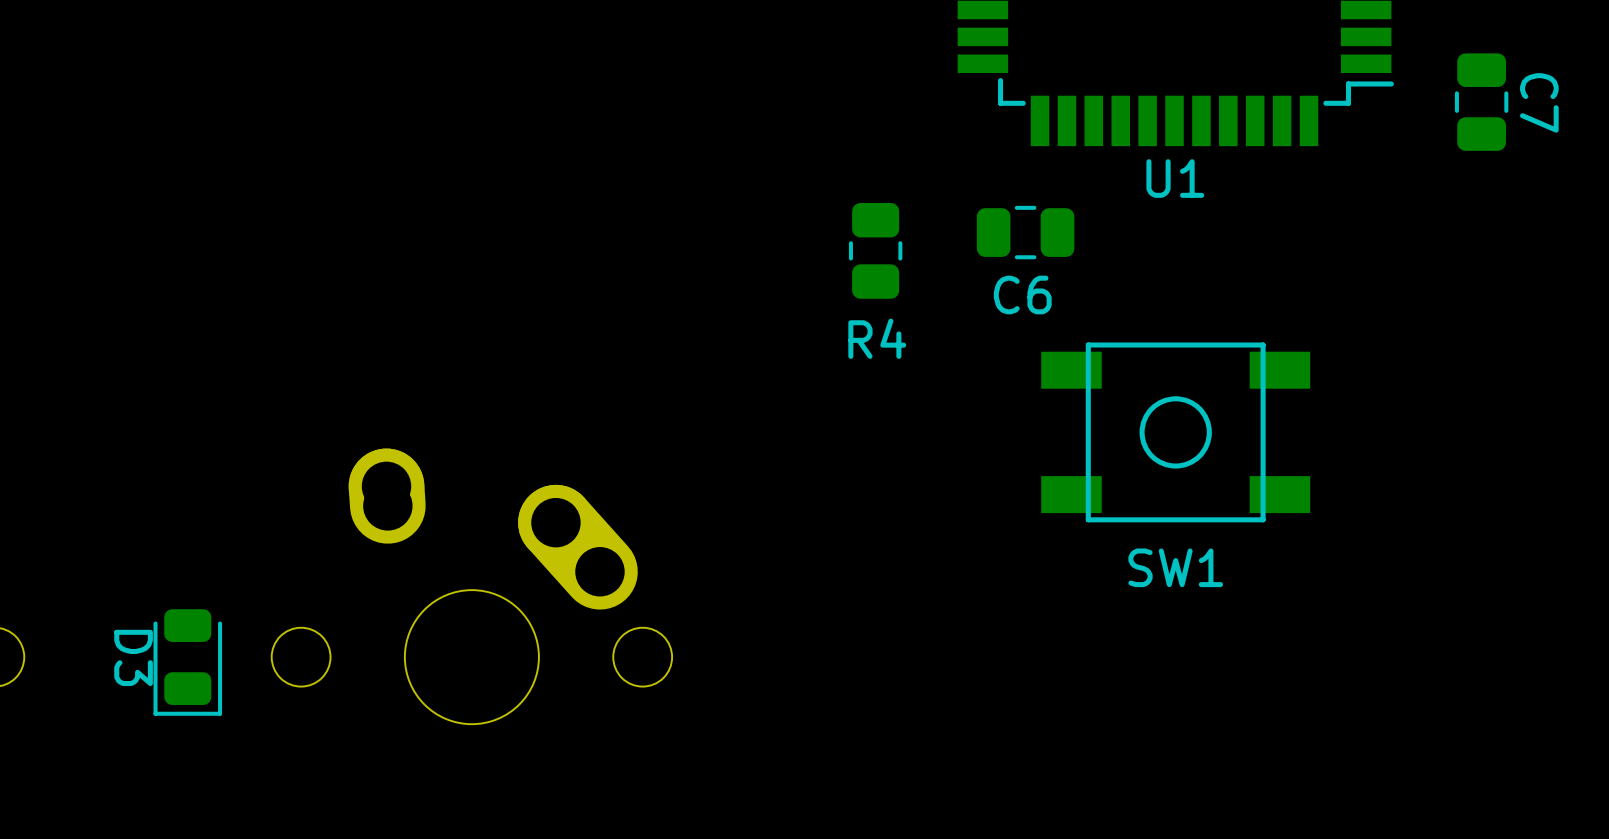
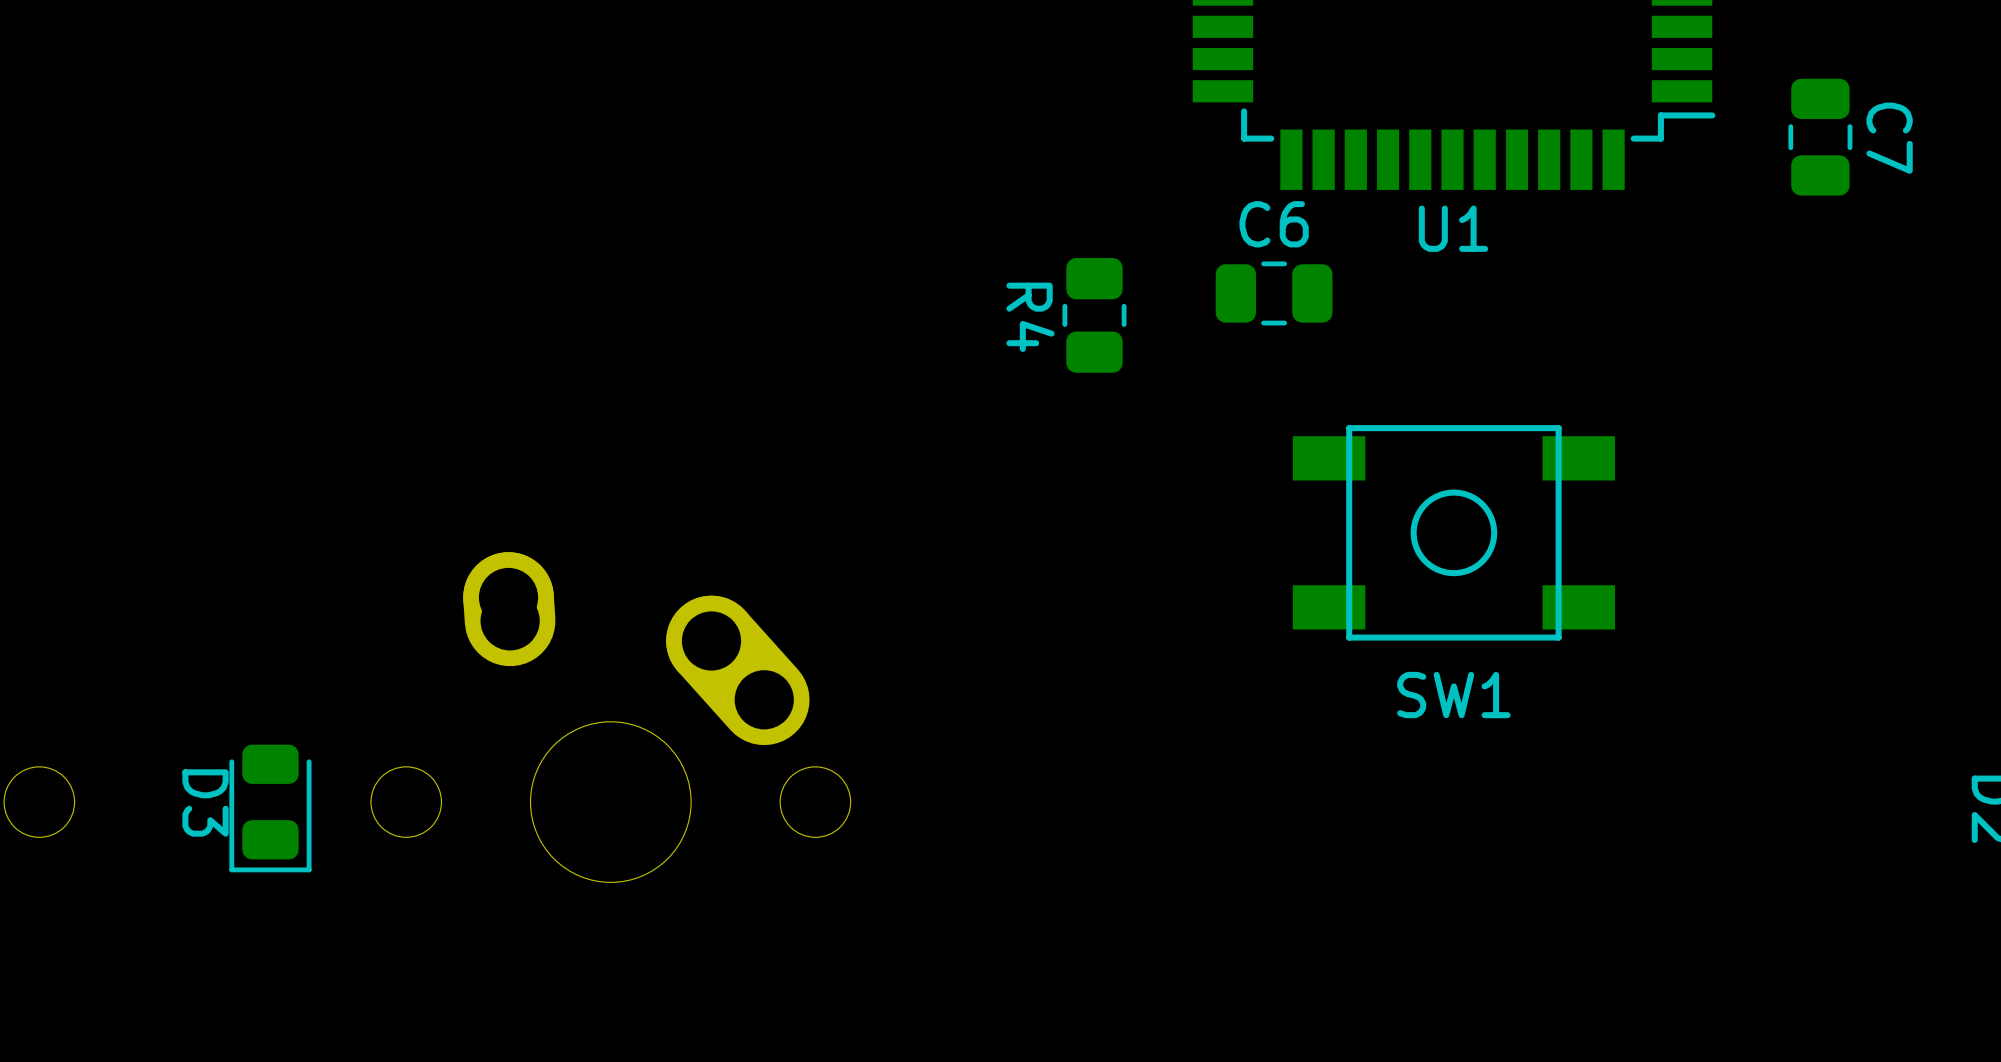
C6 name position: C6 (1022, 295) -> C6 (1274, 224)
R4 name rotation: 0° (877, 338) -> 90° clockwise (1030, 317)
R4 name position: R4 (877, 338) -> R4 (1030, 317)

